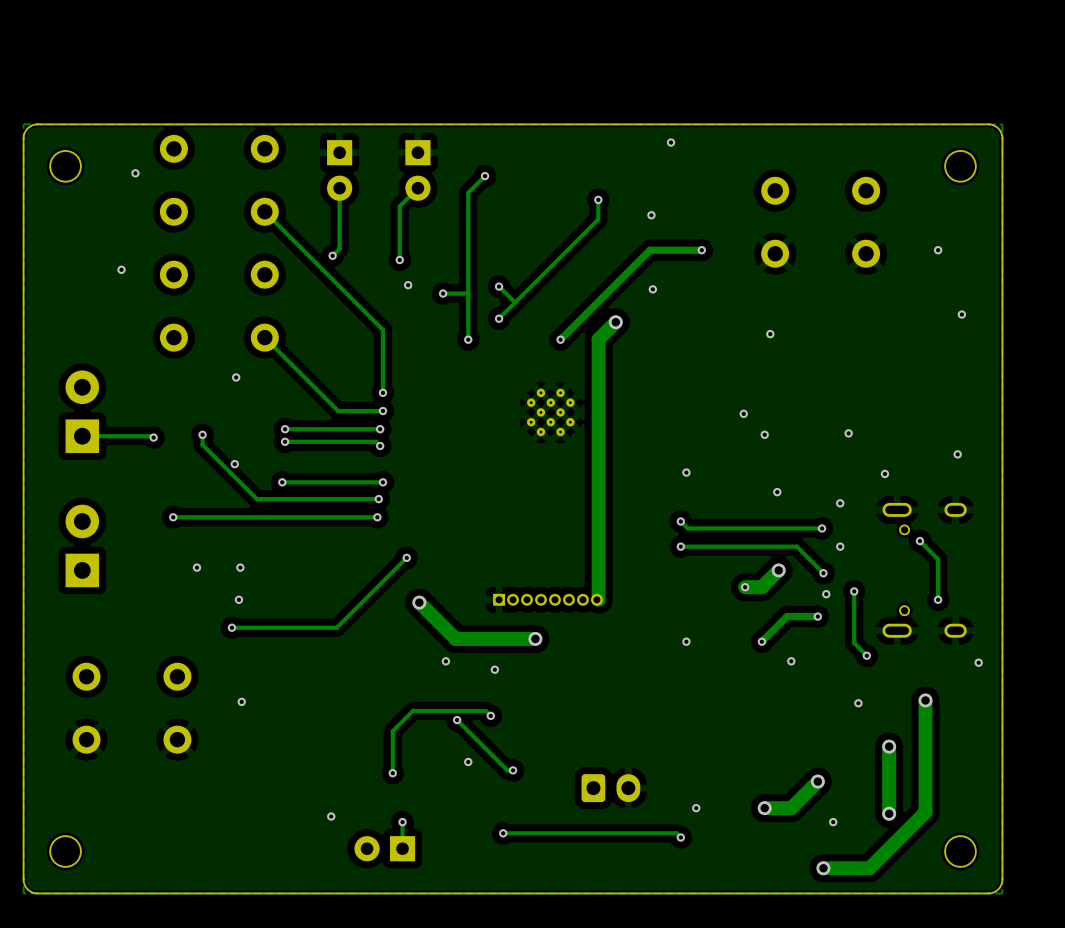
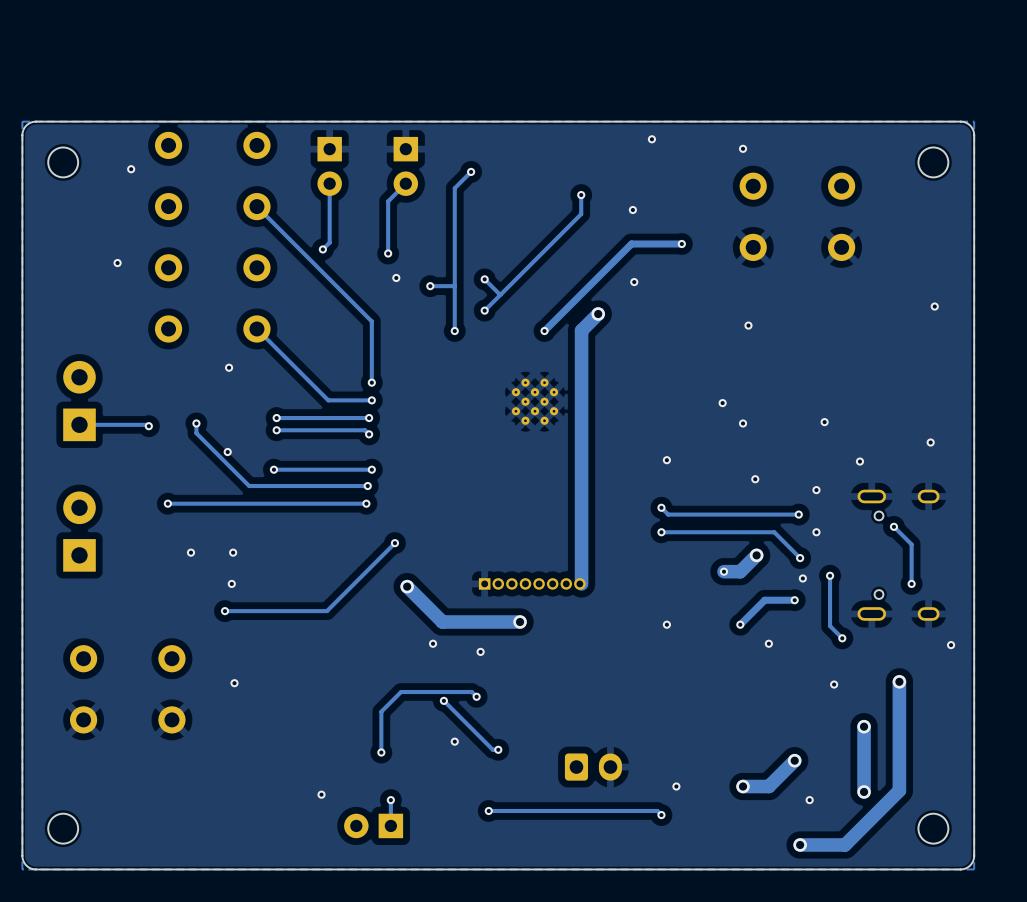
via: none -> (743, 148)
via: (938, 250) -> none

